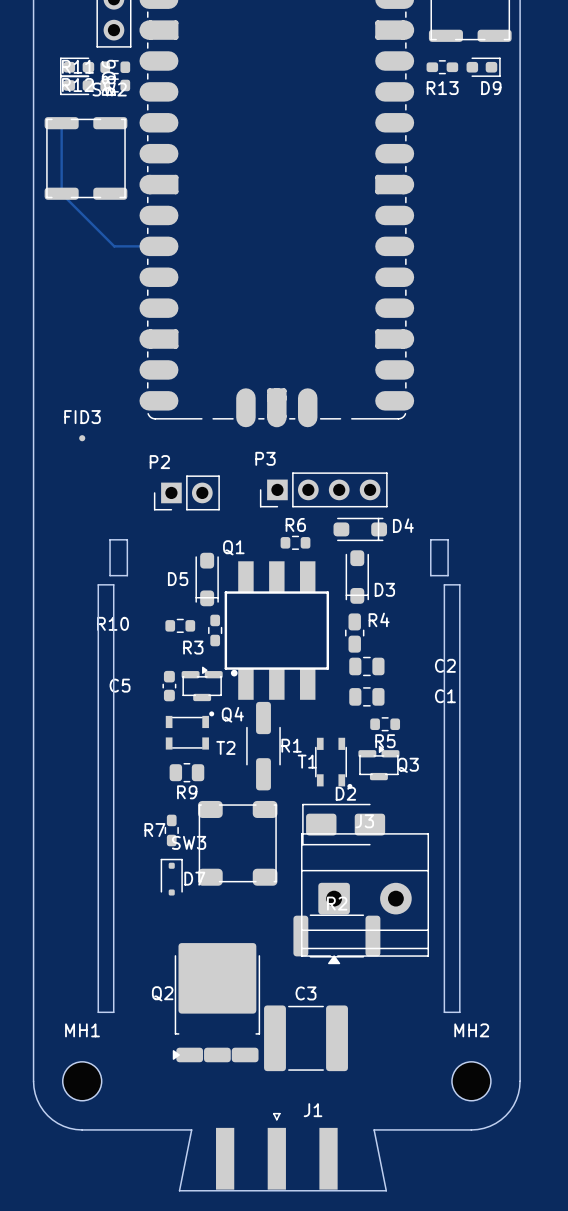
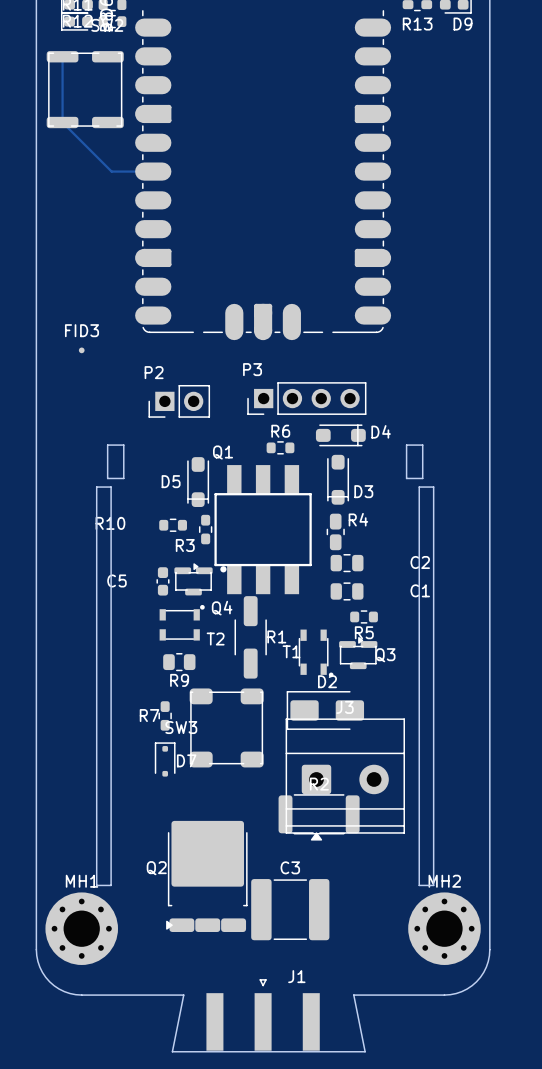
MH1 footprint: [62, 1061, 102, 1101] -> [45, 892, 119, 965]
MH2 footprint: [451, 1061, 491, 1101] -> [408, 892, 481, 965]

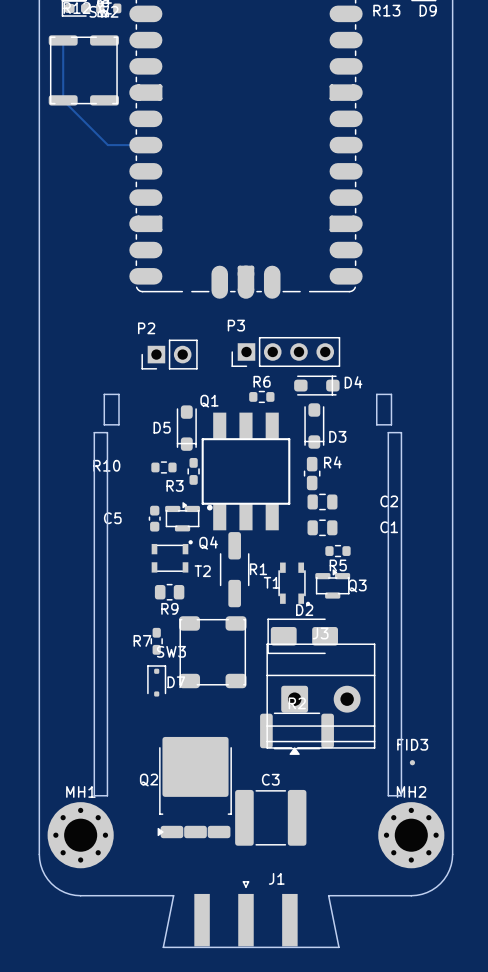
FID3 position: (81, 350) -> (412, 762)

